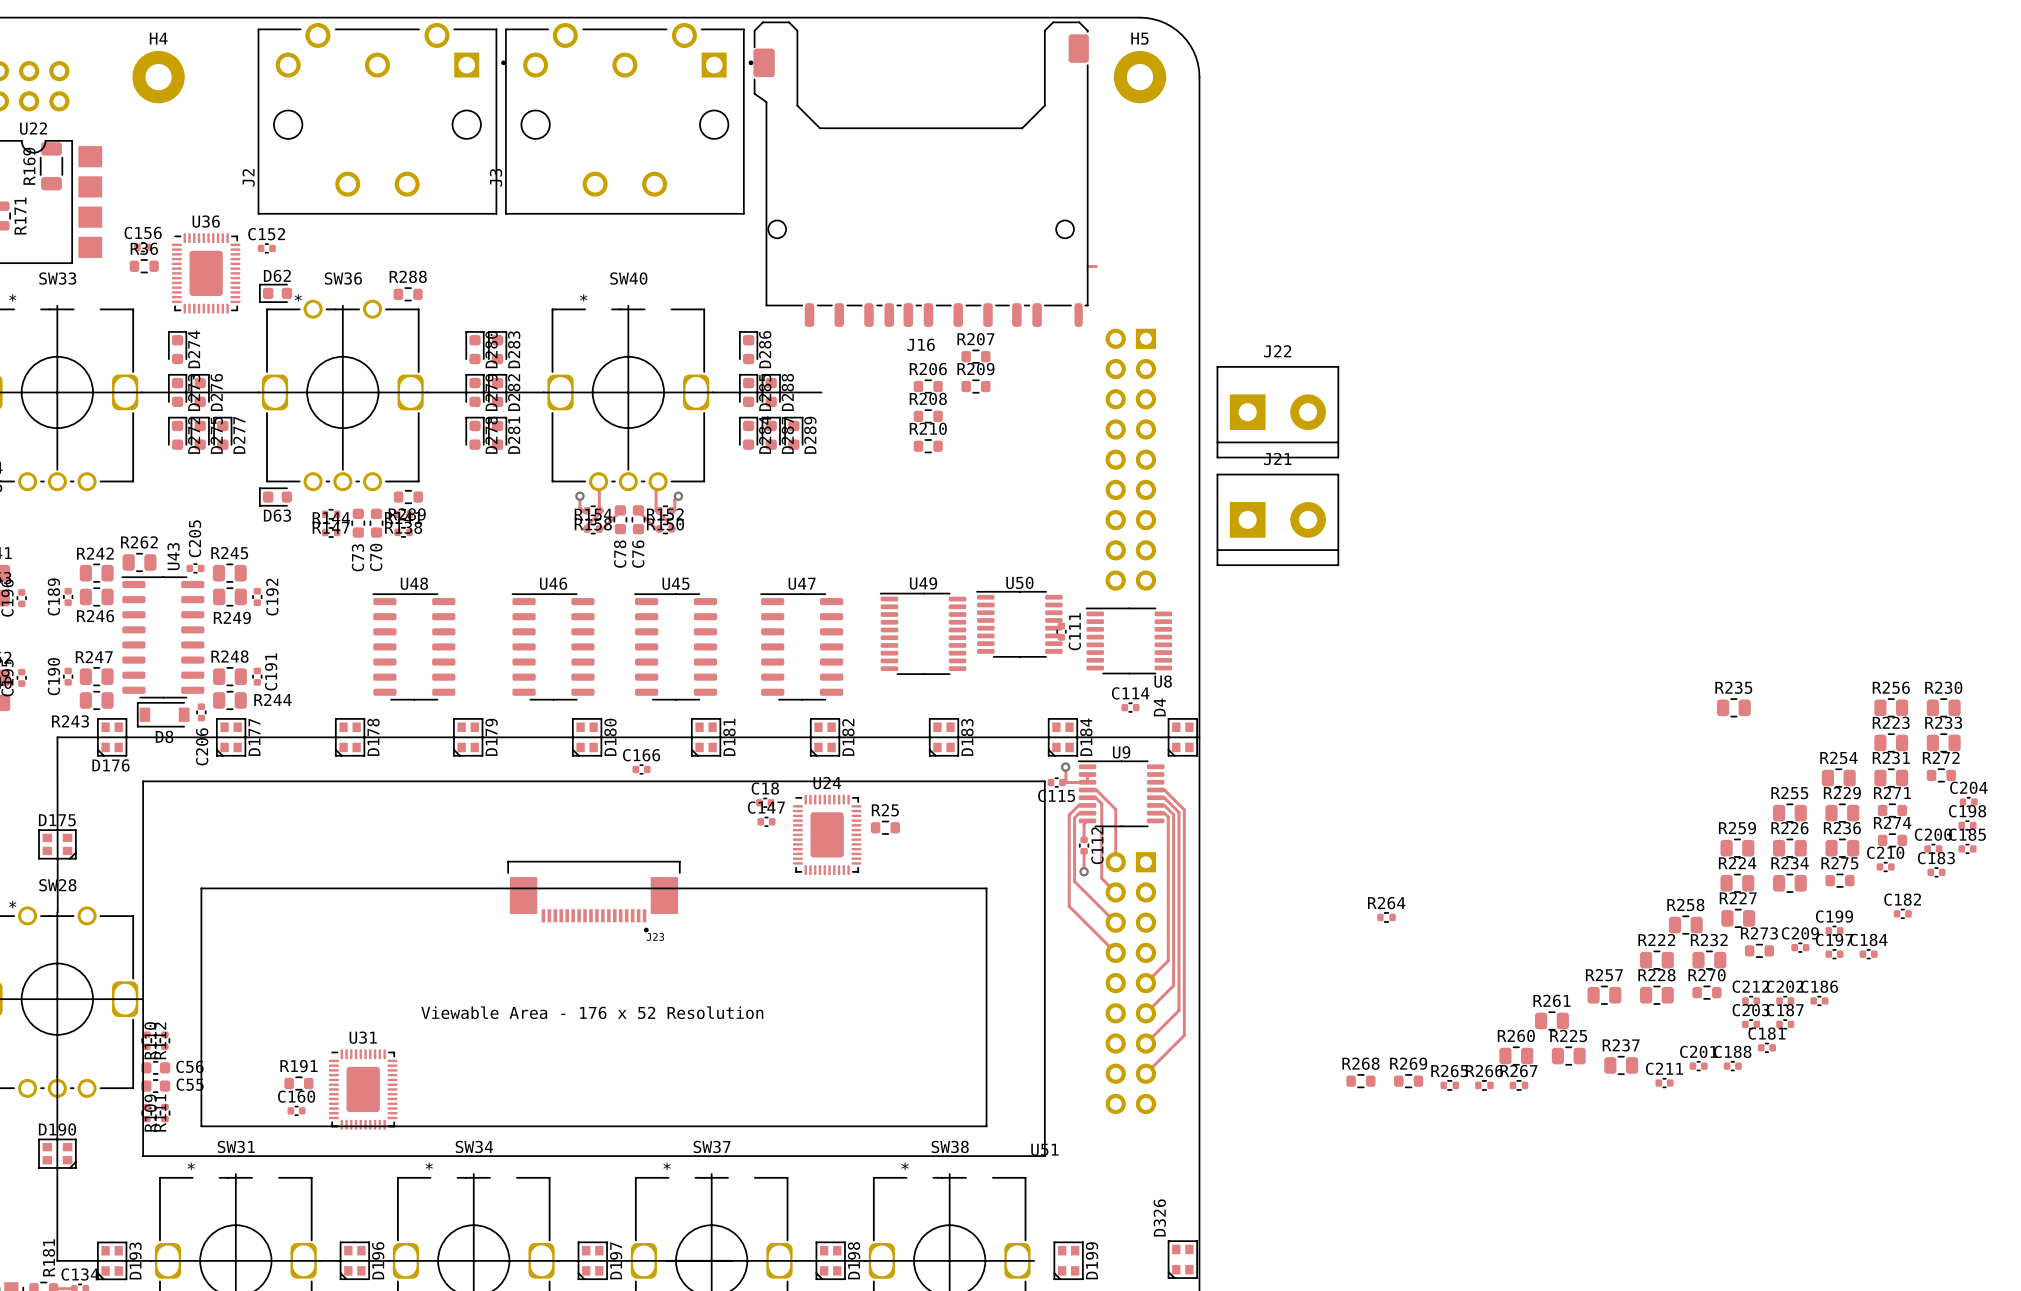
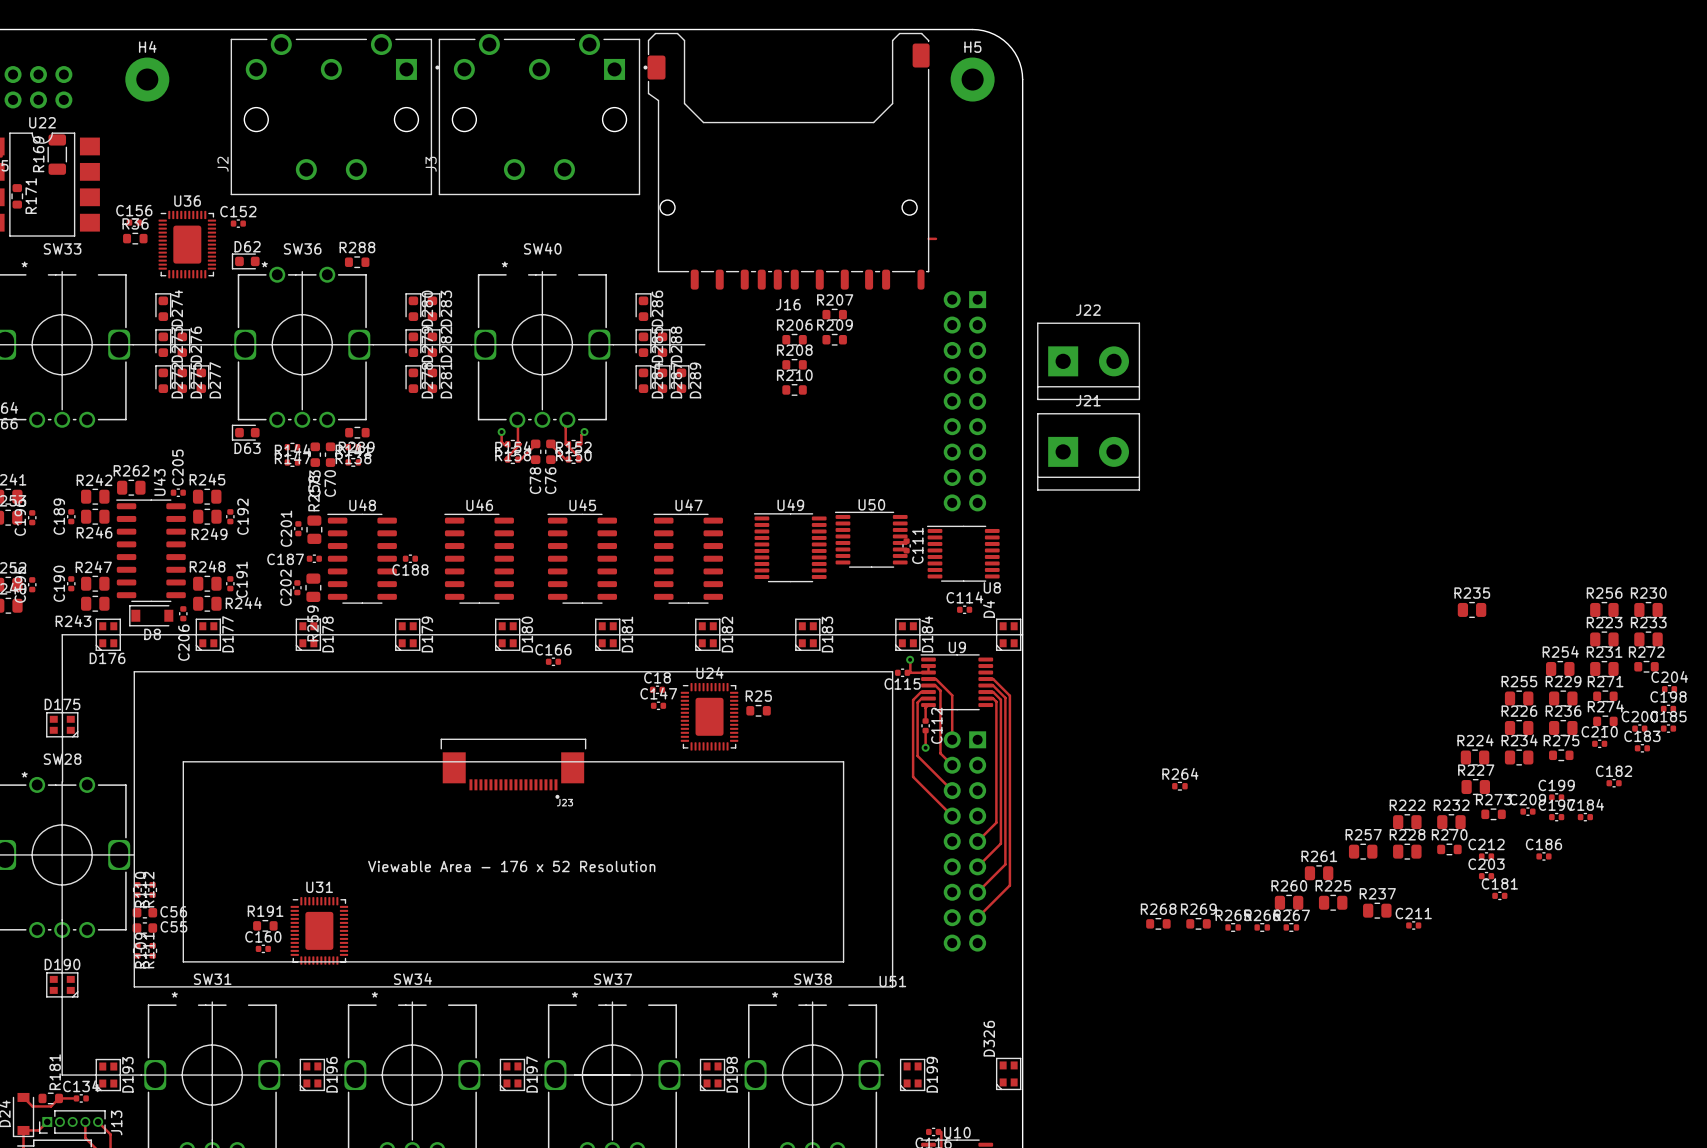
R259 name position: R259 (1737, 828) -> R259 (312, 623)
R259 rotation: 0° (1737, 848) -> 90° clockwise (313, 587)
R259 position: (1737, 848) -> (313, 587)
R258 rotation: 0° (1685, 925) -> 90° clockwise (314, 529)
R258 position: (1685, 925) -> (314, 529)
C202 rotation: 0° (1785, 1000) -> 90° clockwise (297, 587)
C202 position: (1785, 1000) -> (297, 587)
C187 name position: C187 (1785, 1010) -> C187 (285, 559)
C187 position: (1785, 1024) -> (314, 558)
C188 name position: C188 (1732, 1051) -> C188 (410, 569)
C201 rotation: 0° (1698, 1066) -> 90° clockwise (298, 528)
C201 position: (1698, 1066) -> (298, 528)
C188 position: (1732, 1066) -> (410, 558)

